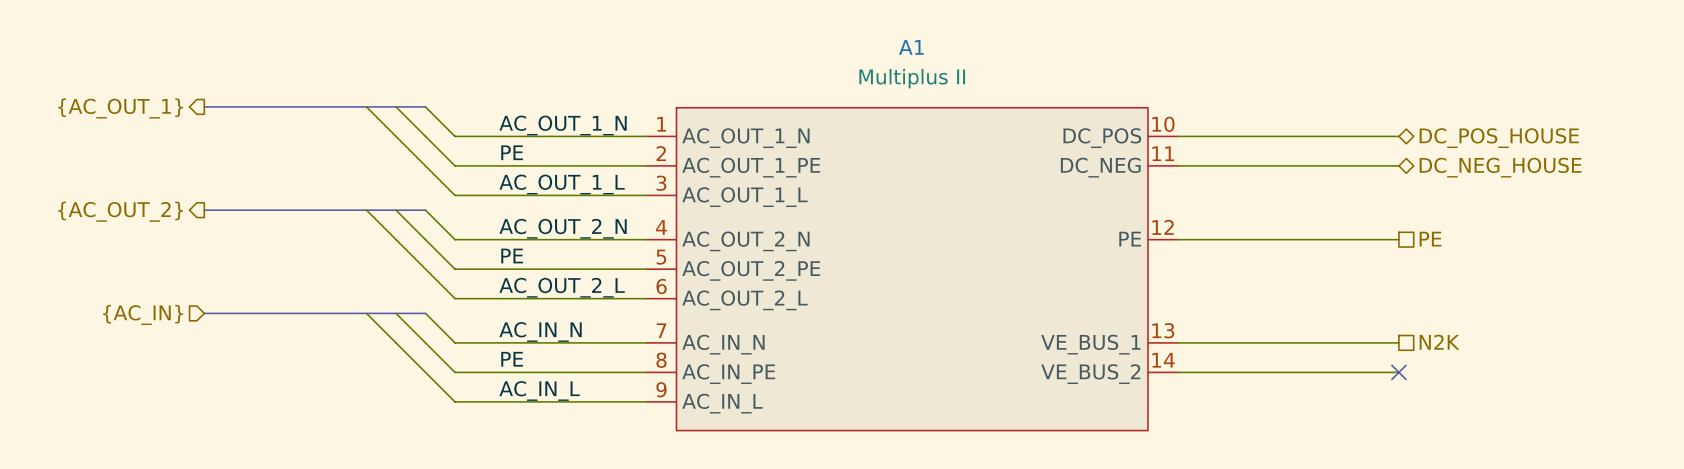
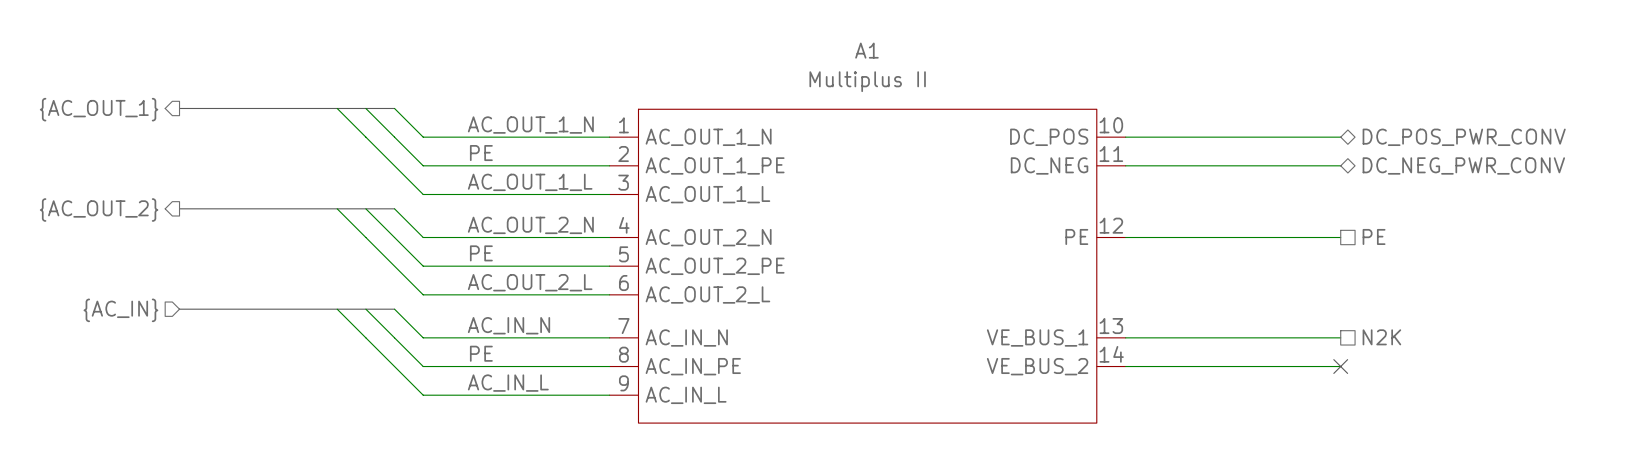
hierarchical label: DC_POS_HOUSE (1499, 138) -> DC_POS_PWR_CONV (1464, 137)
hierarchical label: DC_NEG_HOUSE (1500, 167) -> DC_NEG_PWR_CONV (1463, 165)

